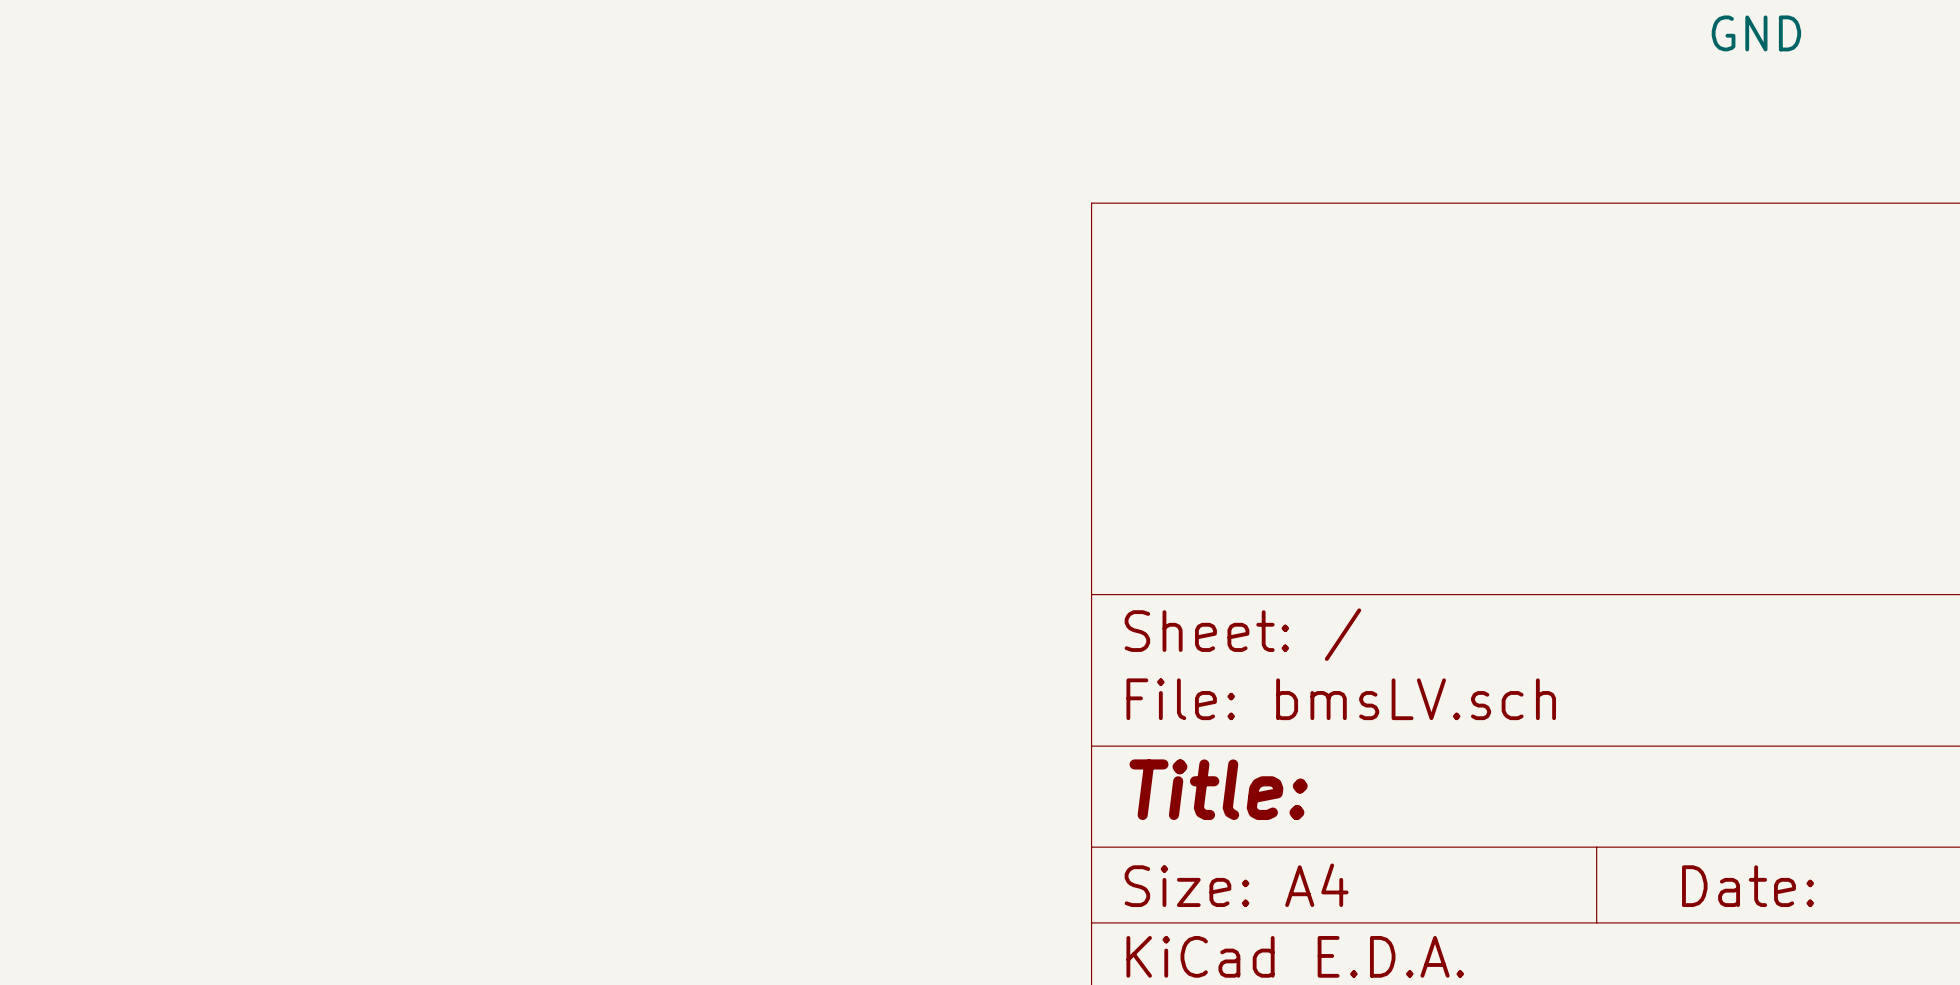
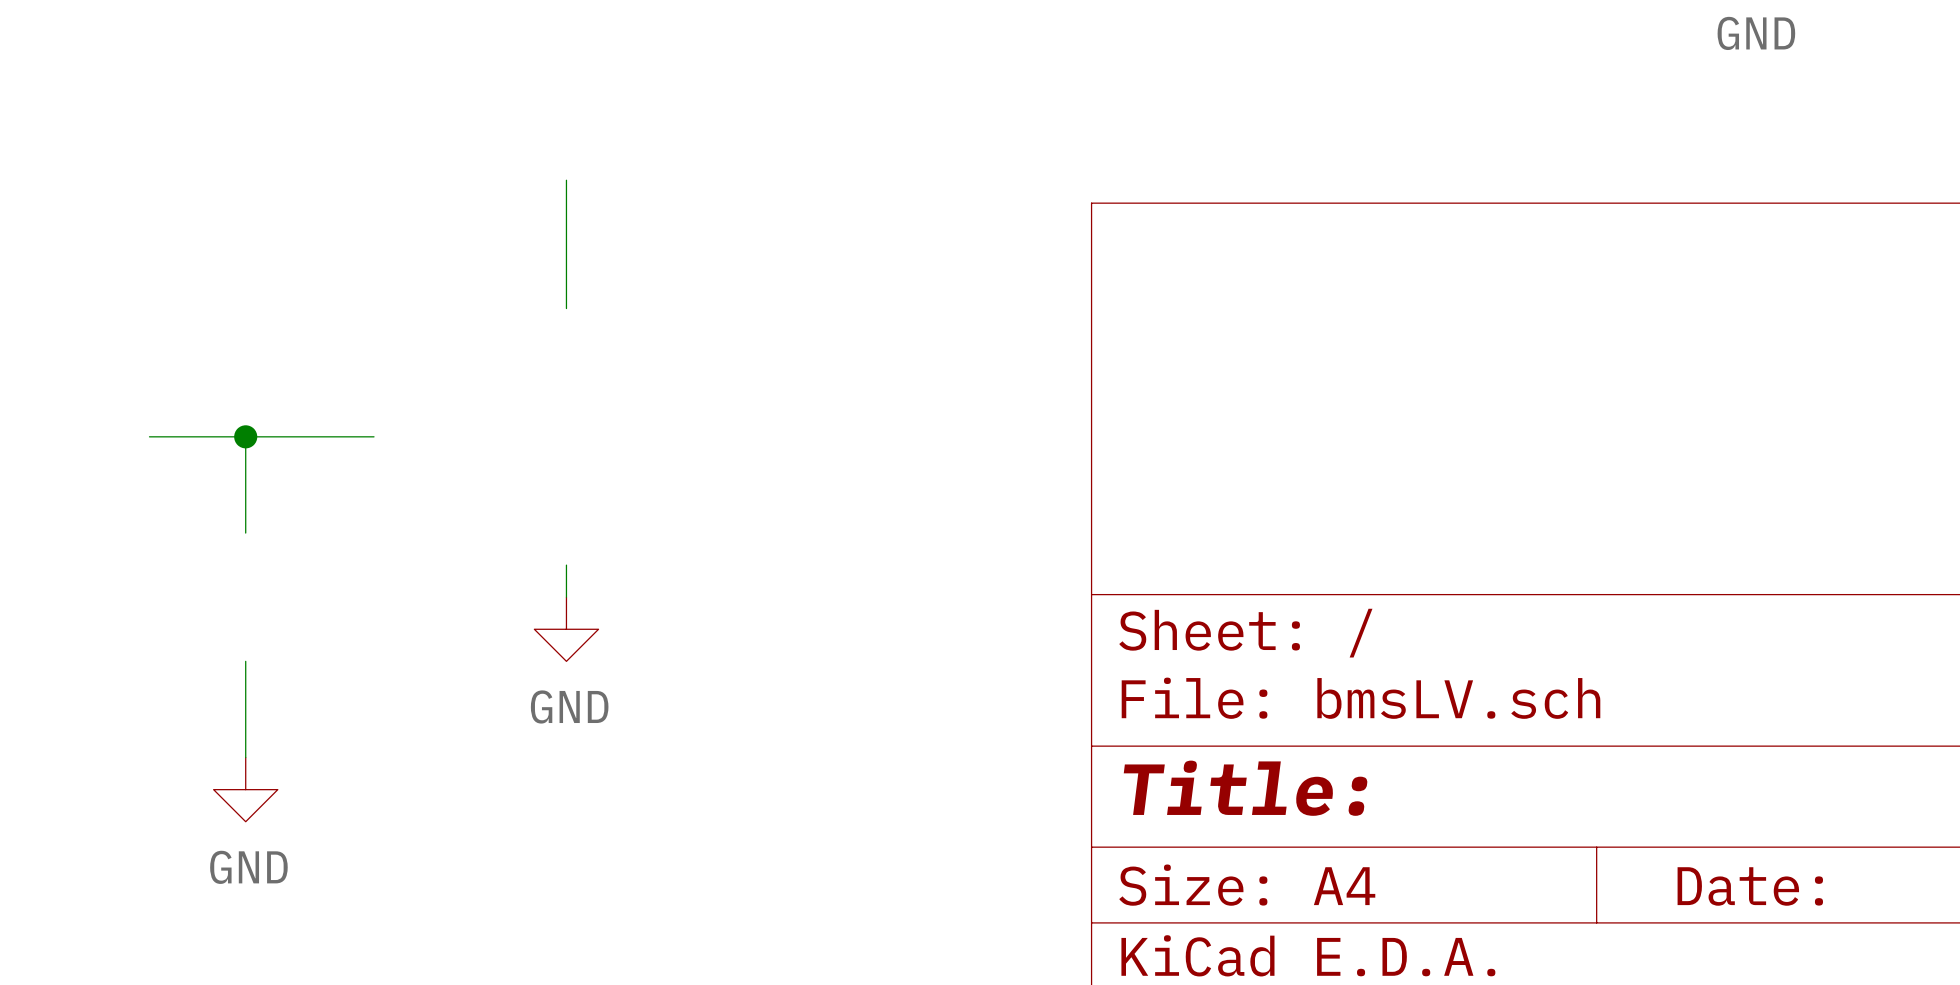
wire: none -> (566, 180) (566, 308)
wire: none -> (149, 436) (374, 436)
wire: none -> (245, 436) (245, 533)
junction: none -> (245, 436)
wire: none -> (566, 565) (566, 597)
power symbol: none -> GND (566, 629)
wire: none -> (245, 661) (245, 757)
power symbol: none -> GND (245, 789)

